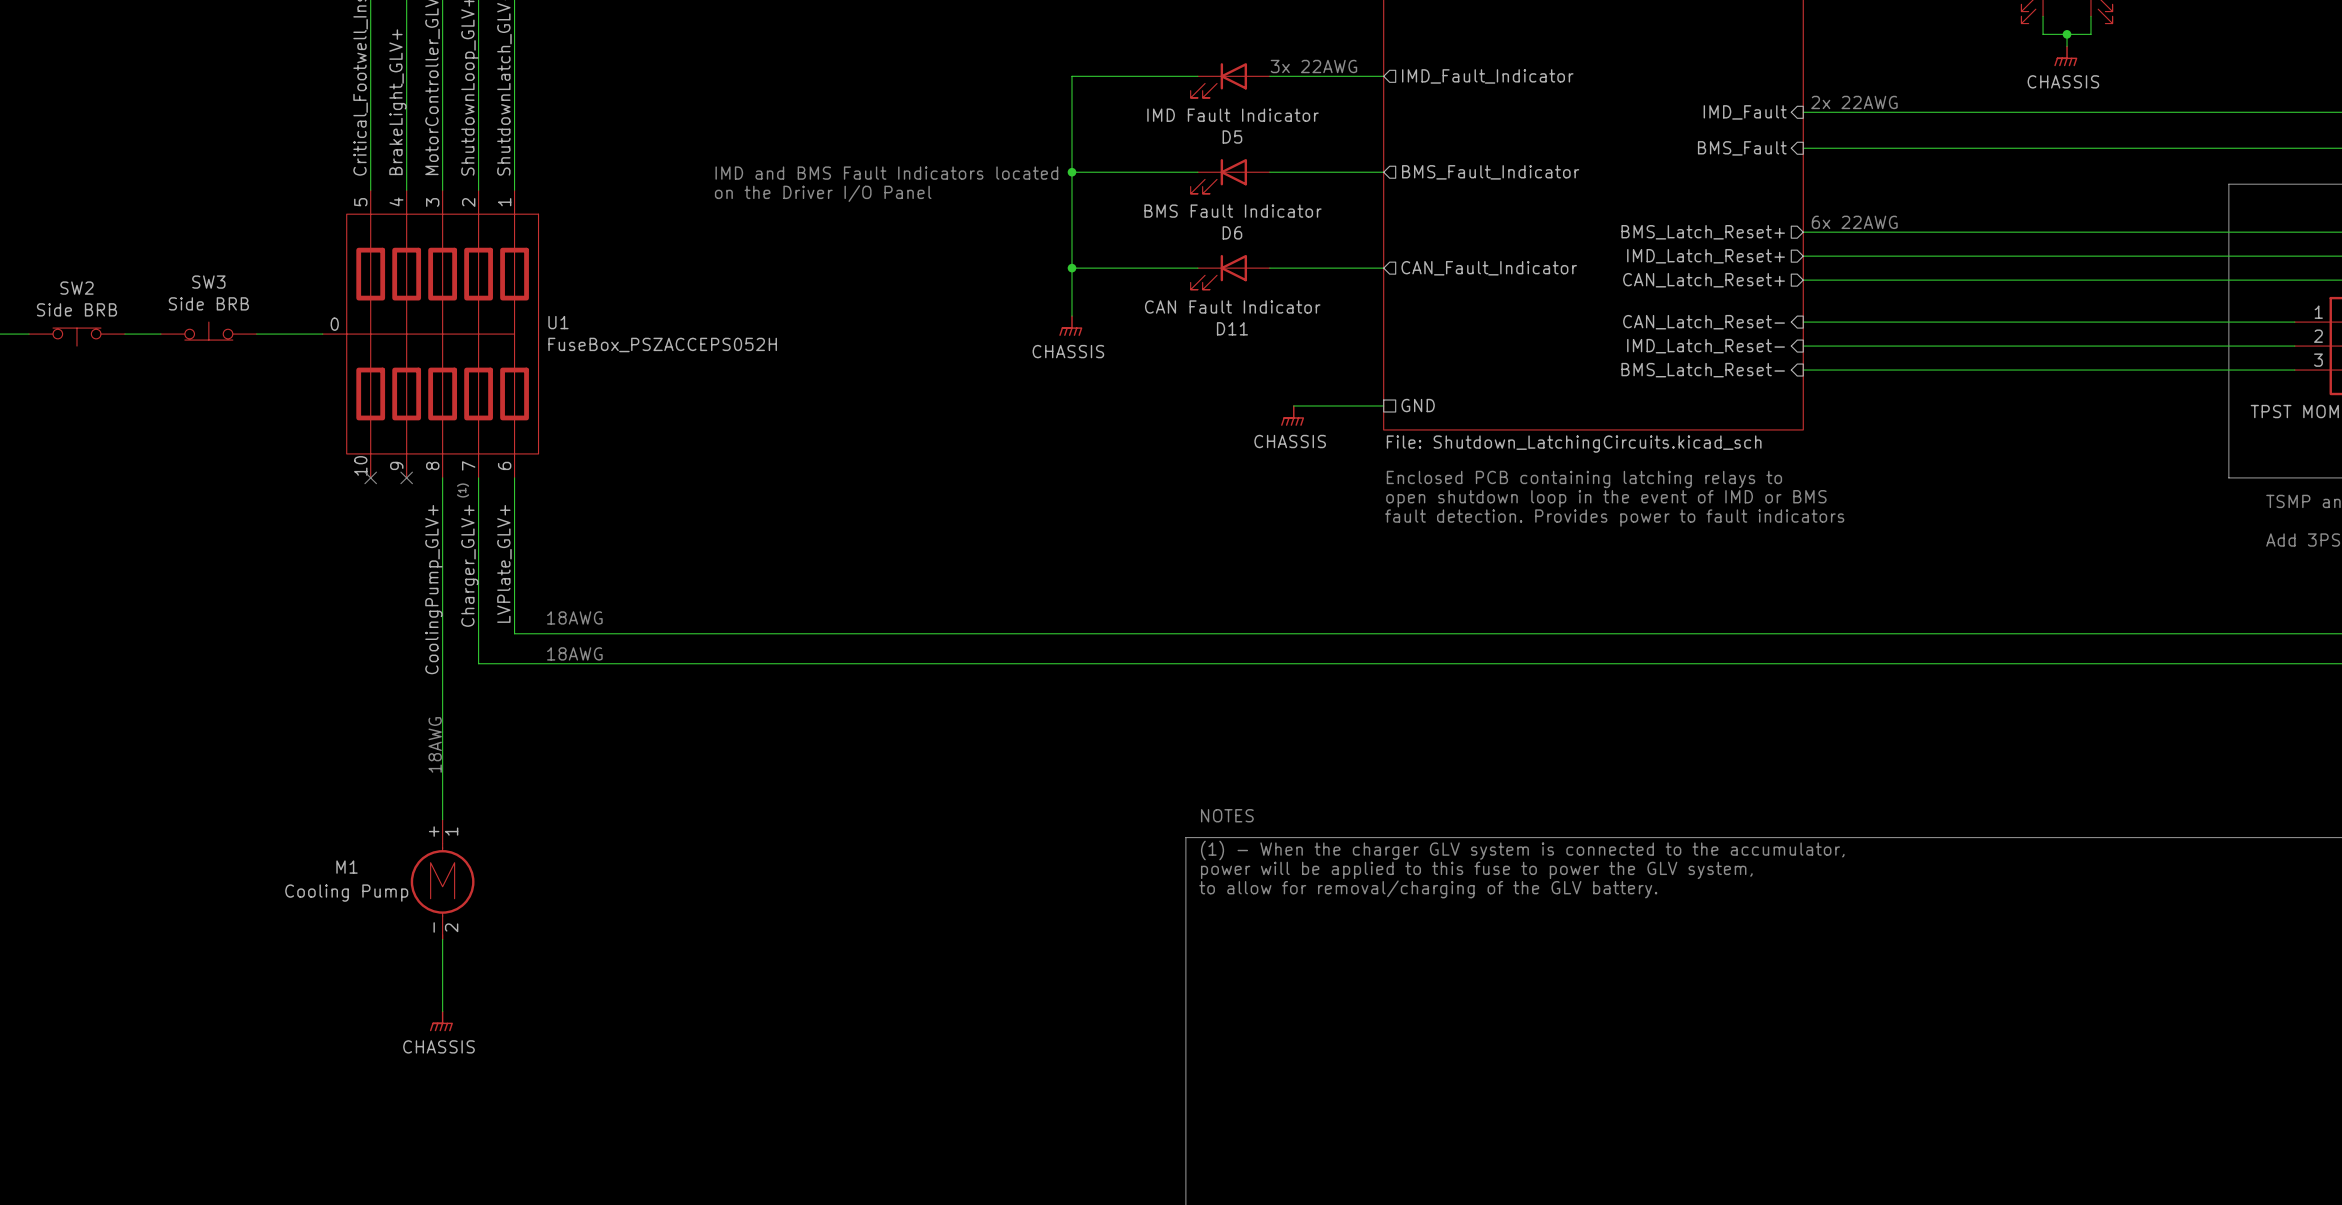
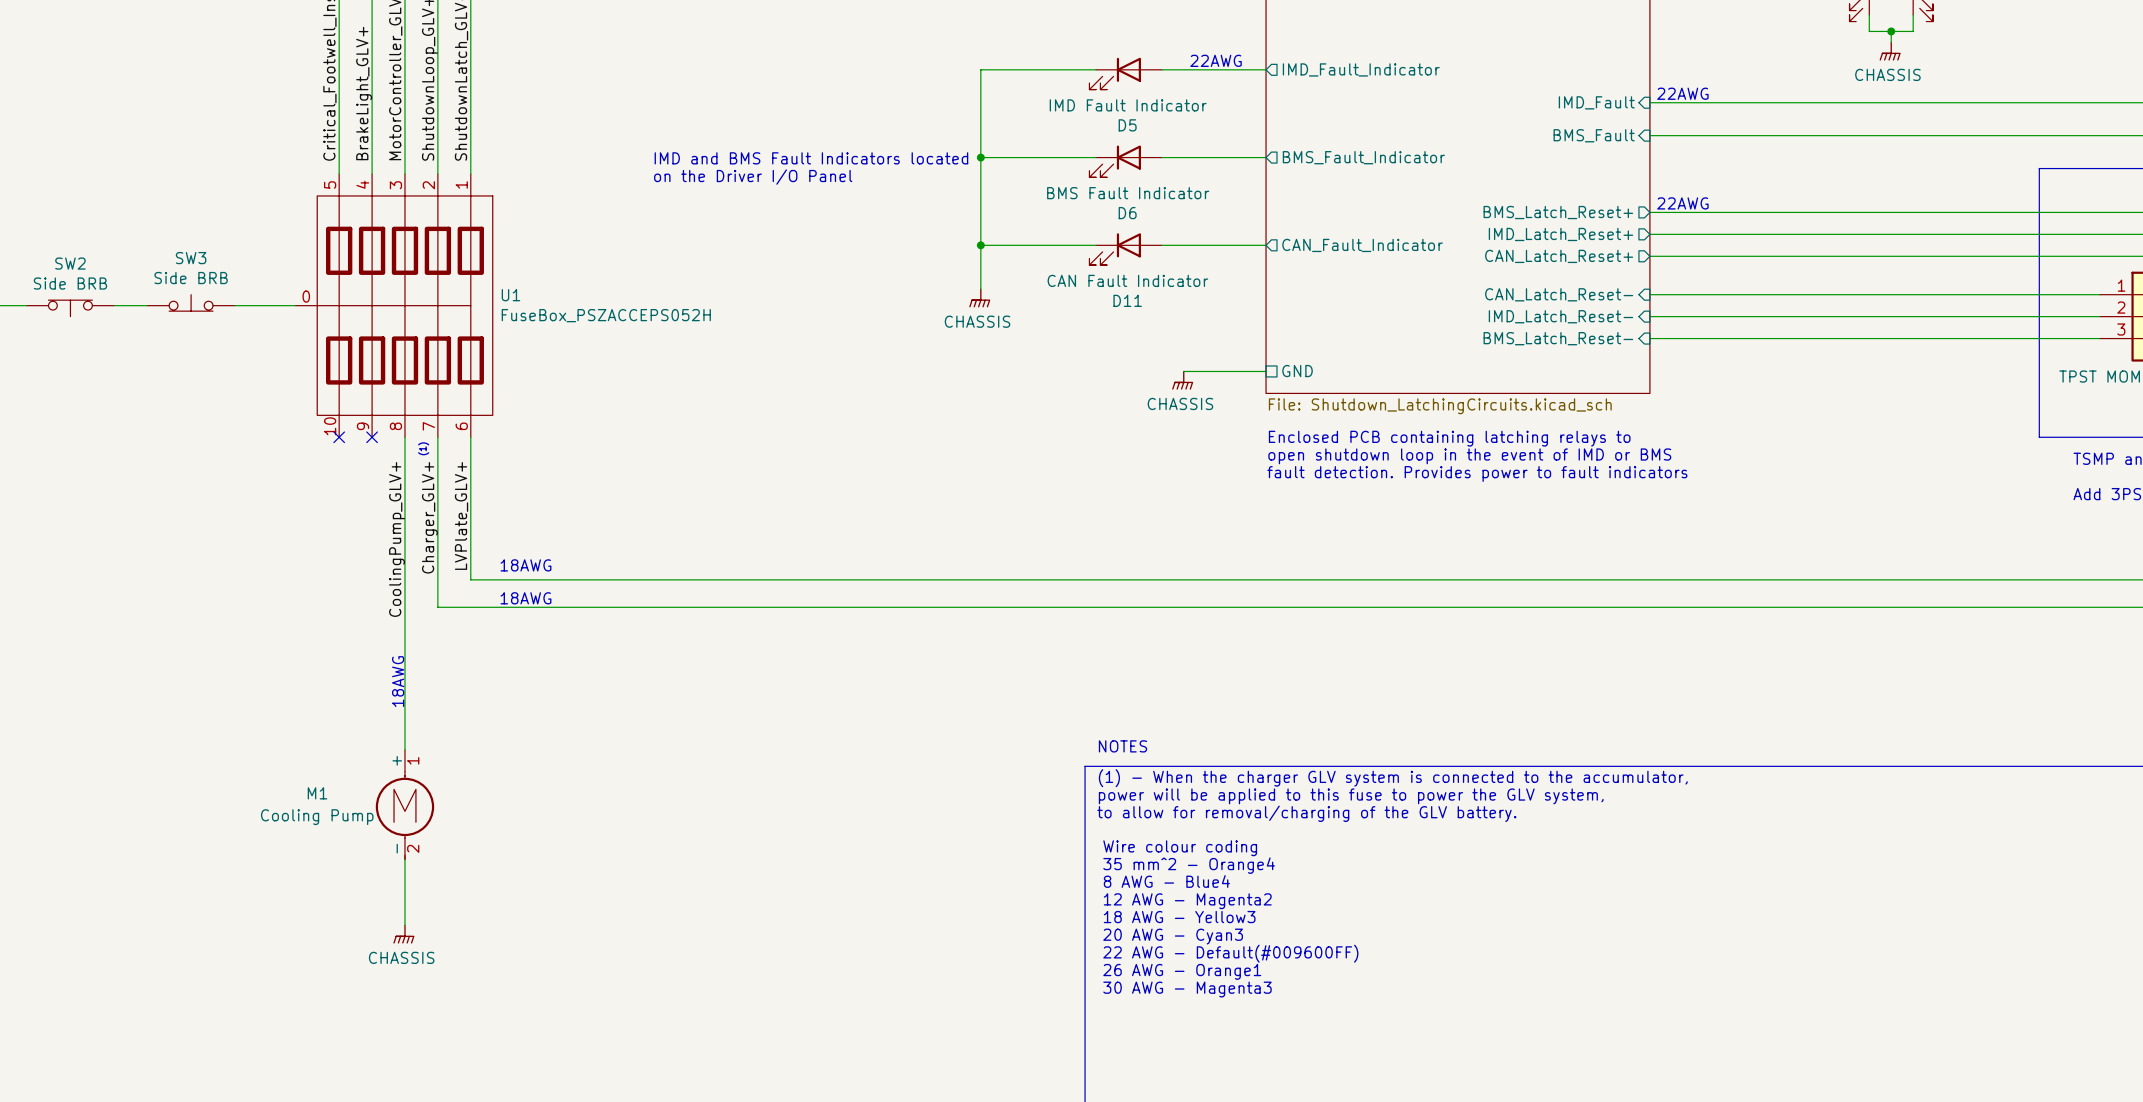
text: 3x 22AWG (1313, 66) -> 22AWG (1216, 60)
text: 2x 22AWG (1854, 102) -> 22AWG (1682, 93)
text: 6x 22AWG (1854, 222) -> 22AWG (1682, 203)
text: none -> Wire colour coding (1180, 848)
text: none -> 35 mm^2 - Orange4 (1189, 865)
text: none -> 8 AWG - Blue4 (1166, 881)
text: none -> 12 AWG - Magenta2 (1187, 901)
text: none -> 18 AWG - Yellow3 (1179, 917)
text: none -> 20 AWG - Cyan3 (1173, 936)
text: none -> 22 AWG - Default(#009600FF) (1230, 953)
text: none -> 26 AWG - Orange1 (1182, 971)
text: none -> 30 AWG - Magenta3 (1187, 989)

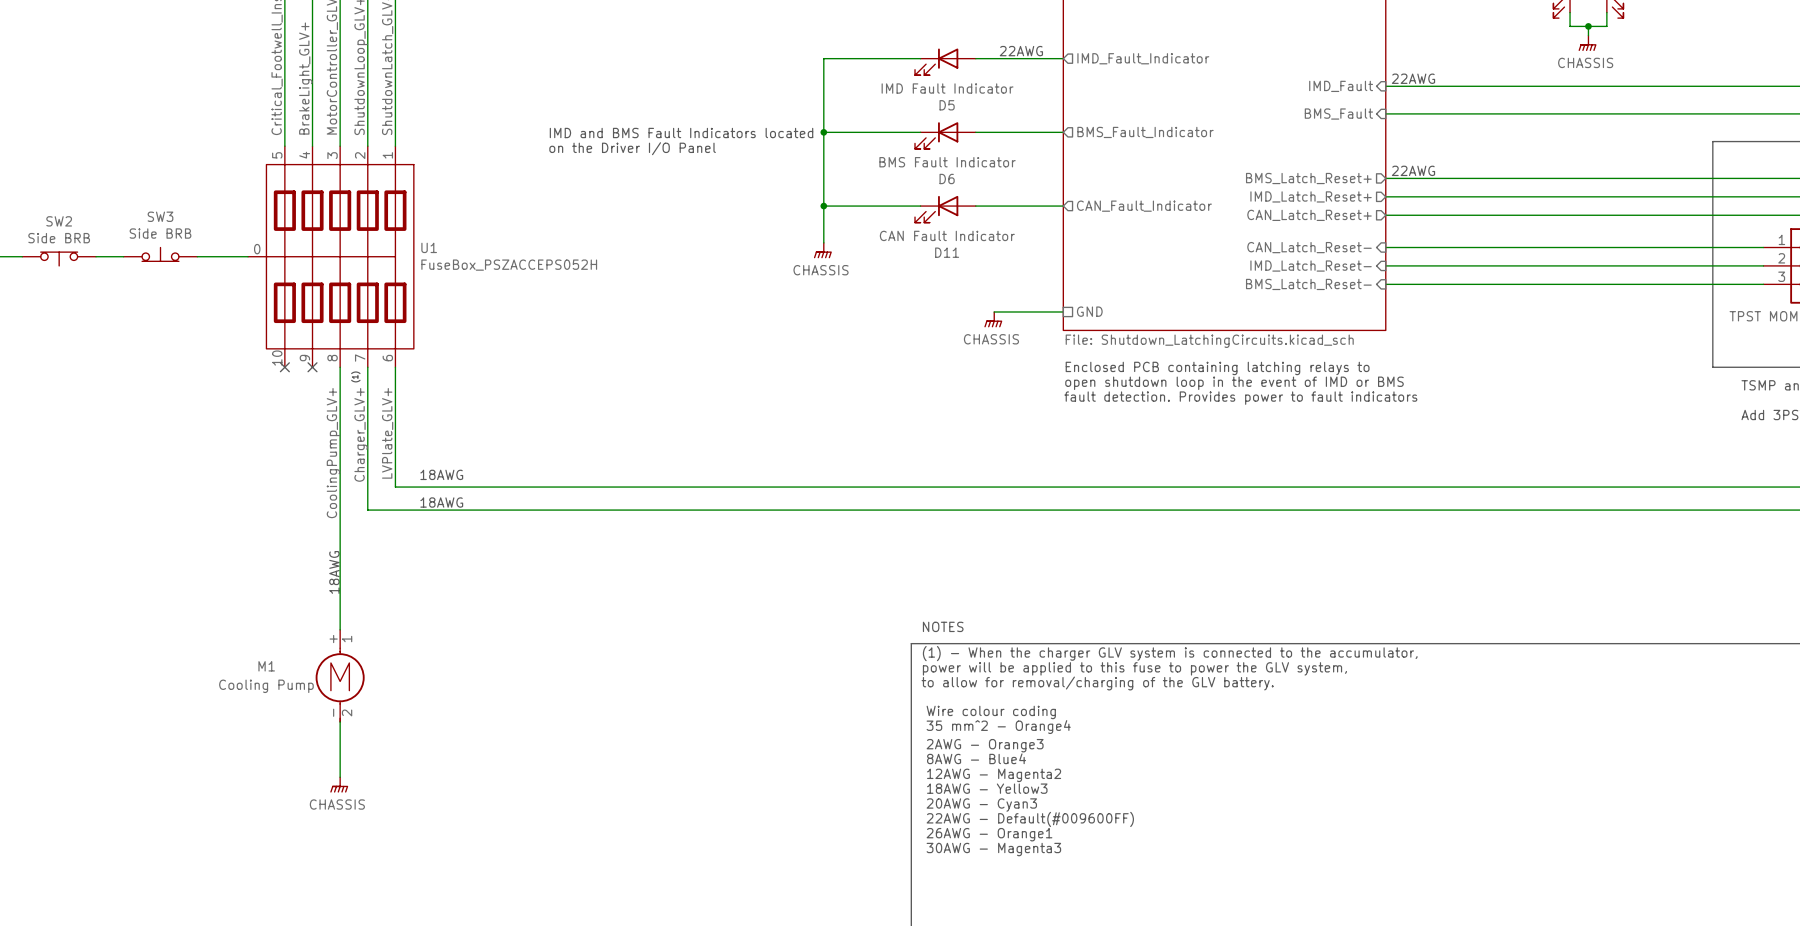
text: 8 AWG - Blue4 (1166, 881) -> 2AWG - Orange3 (985, 745)
text: 12 AWG - Magenta2 (1187, 901) -> 8AWG - Blue4 (976, 758)
text: 18 AWG - Yellow3 (1179, 917) -> 12AWG - Magenta2 (994, 775)
text: 20 AWG - Cyan3 (1173, 936) -> 18AWG - Yellow3 (987, 788)
text: 22 AWG - Default(#009600FF) (1230, 953) -> 20AWG - Cyan3 (981, 805)
text: 26 AWG - Orange1 (1182, 971) -> 22AWG - Default(#009600FF) (1030, 819)
text: 30 AWG - Magenta3 (1187, 989) -> 26AWG - Orange1 (989, 834)
text: none -> 30AWG - Magenta3 (993, 849)

